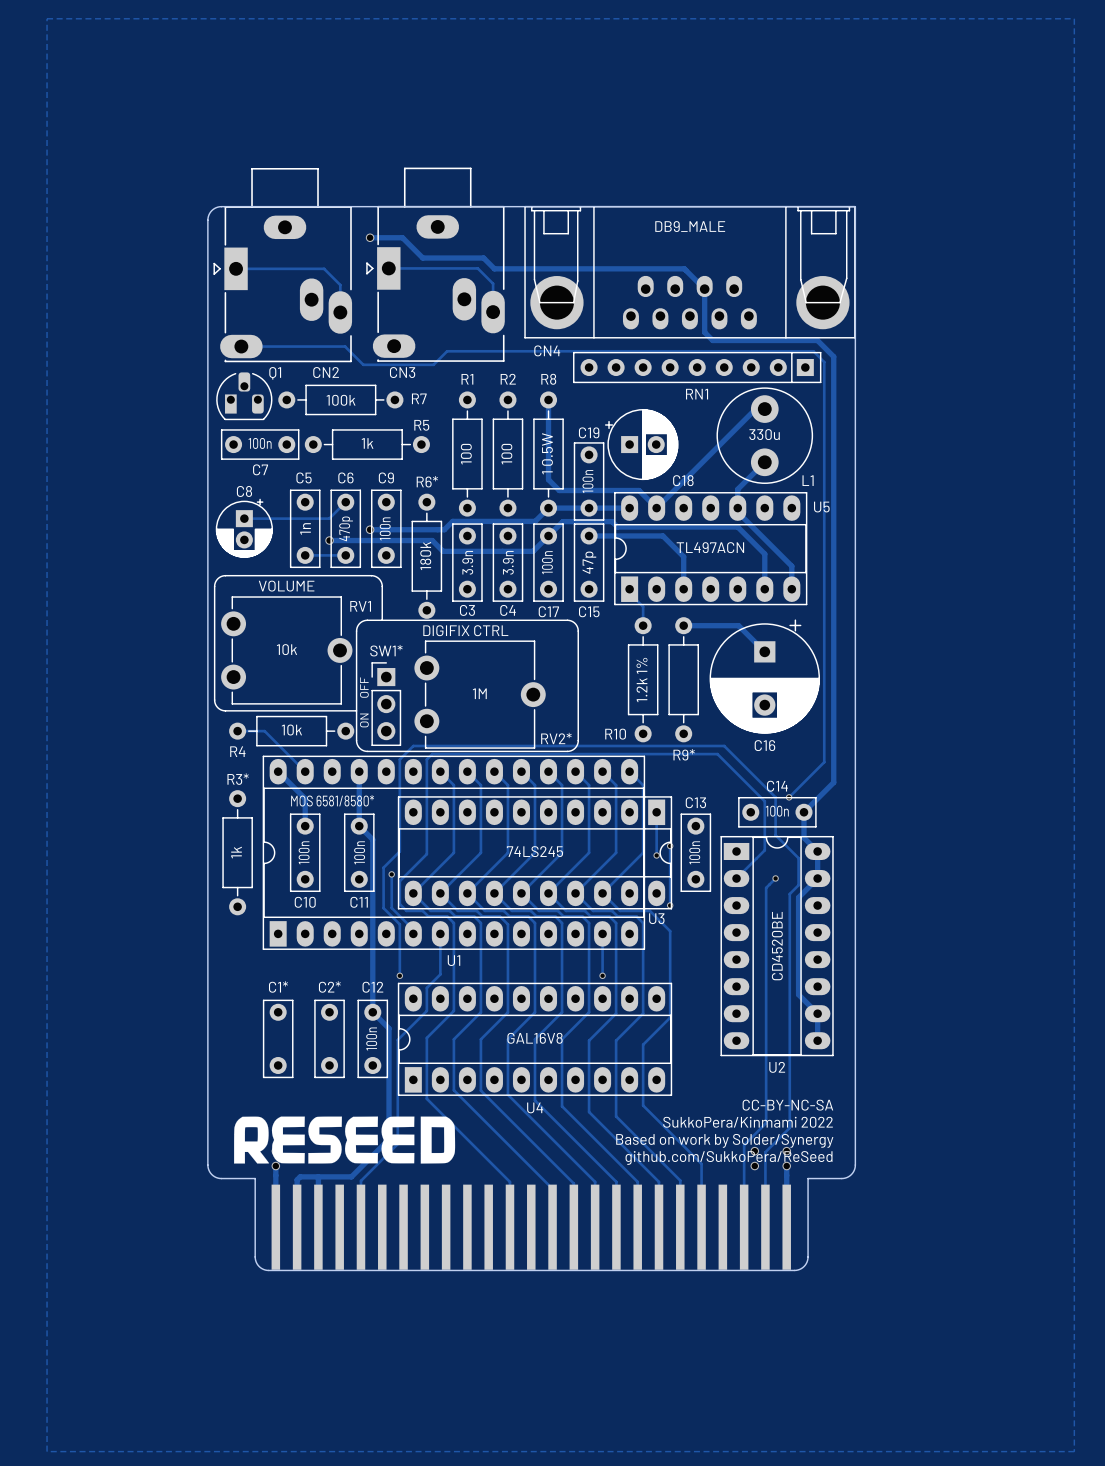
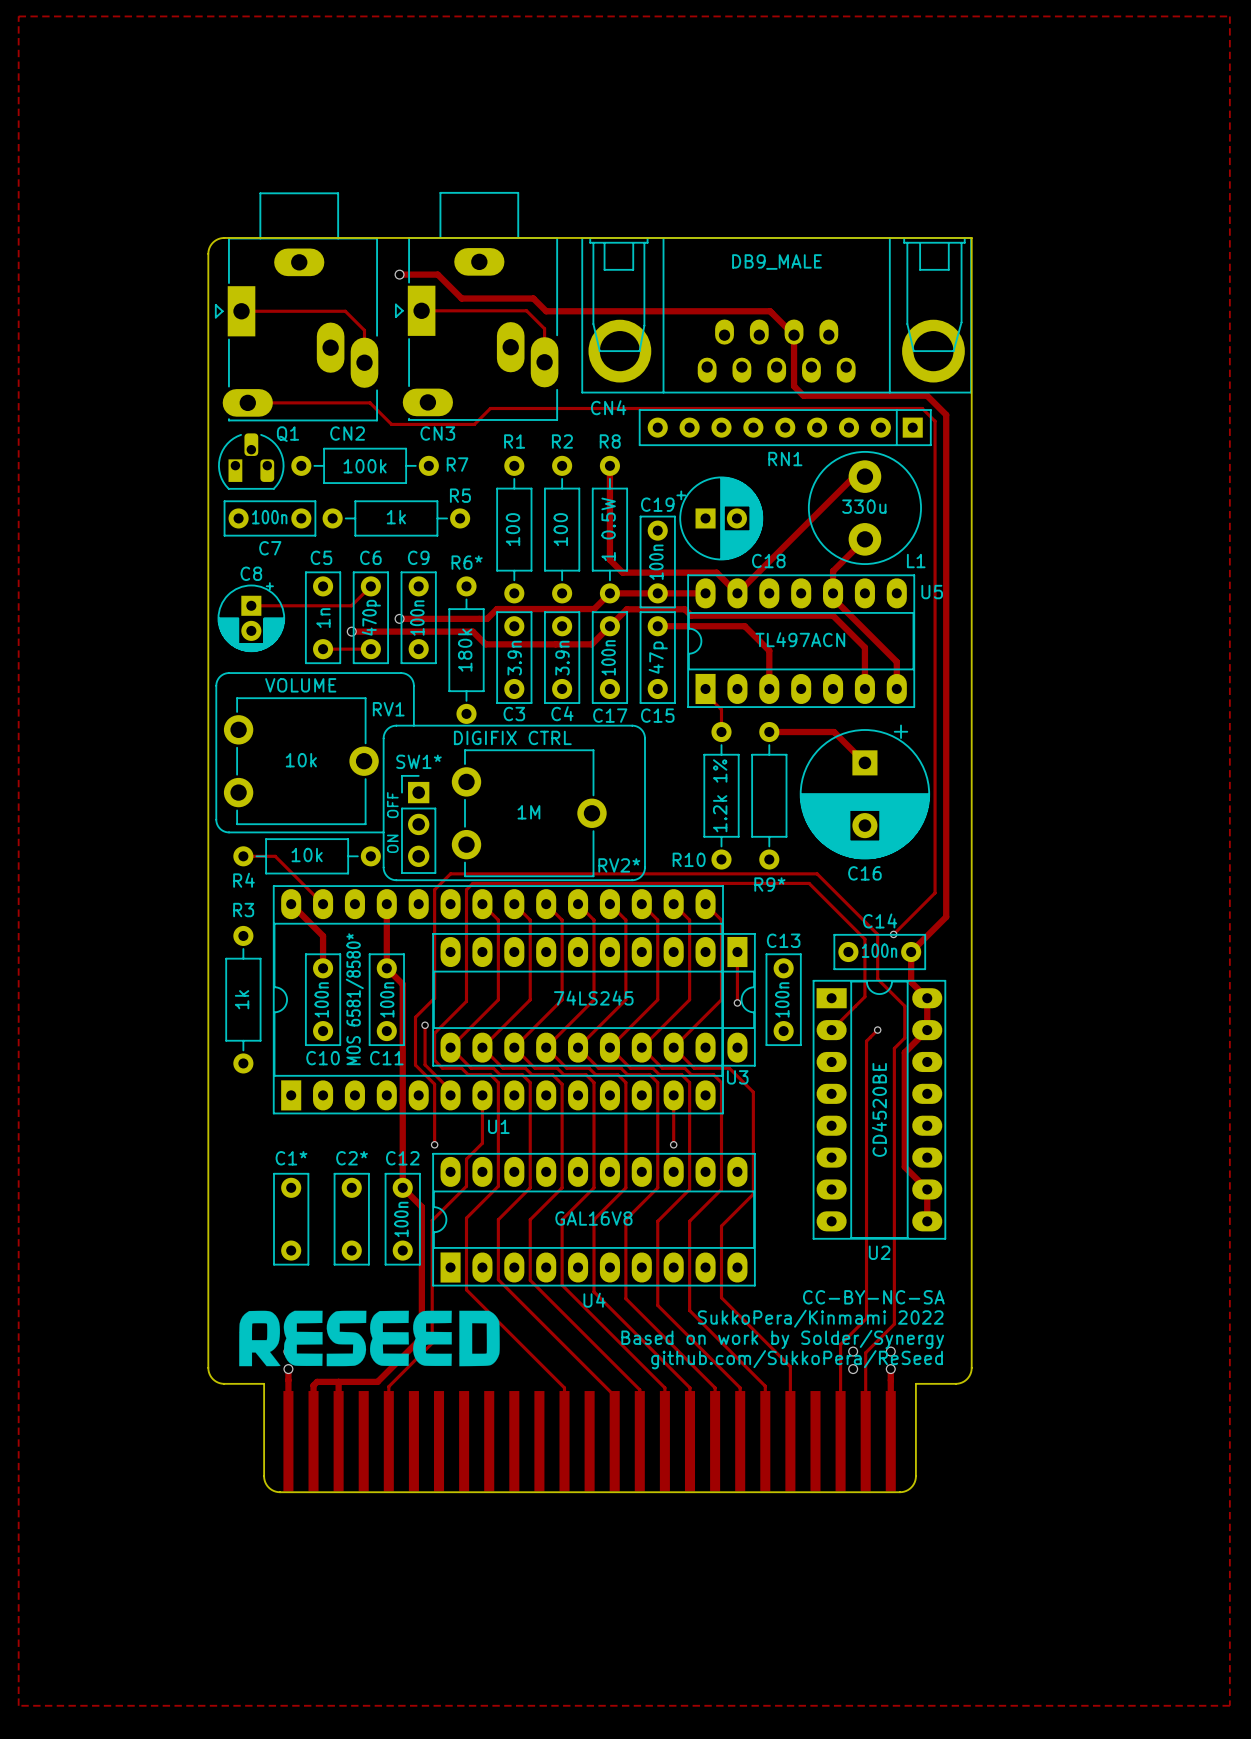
R3 name: none -> R3 (243, 910)
text: R3* (238, 779) -> none
text rotation: 0° (332, 800) -> 90° counterclockwise (354, 999)
track: (670, 846) (670, 905) -> none
via: (670, 846) -> none
via: (670, 905) -> none

